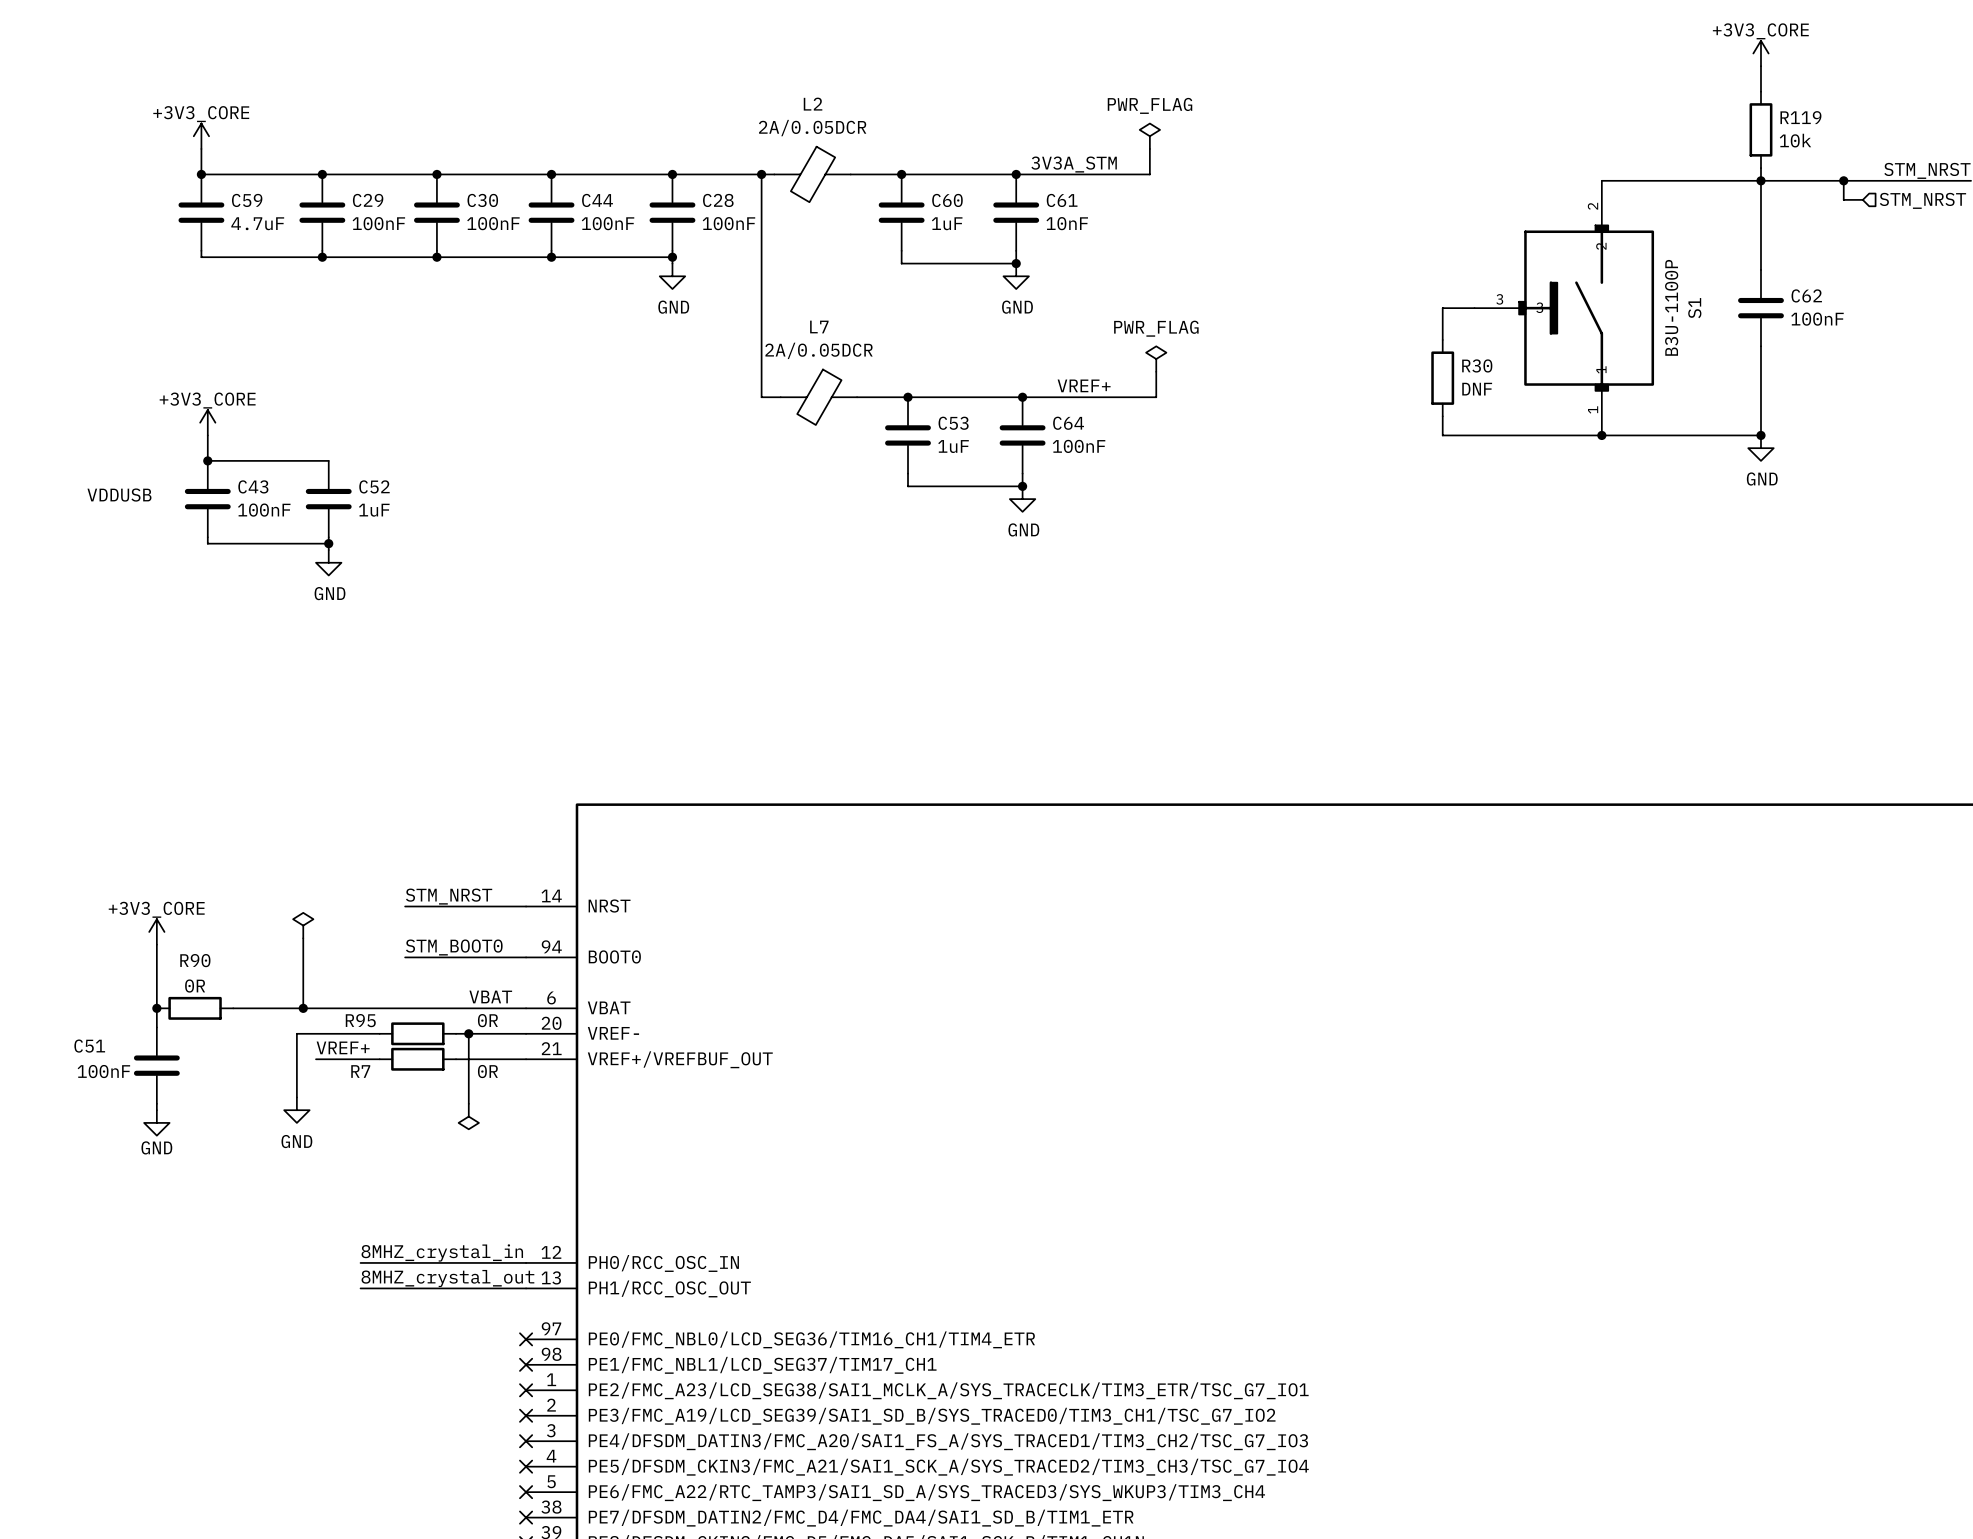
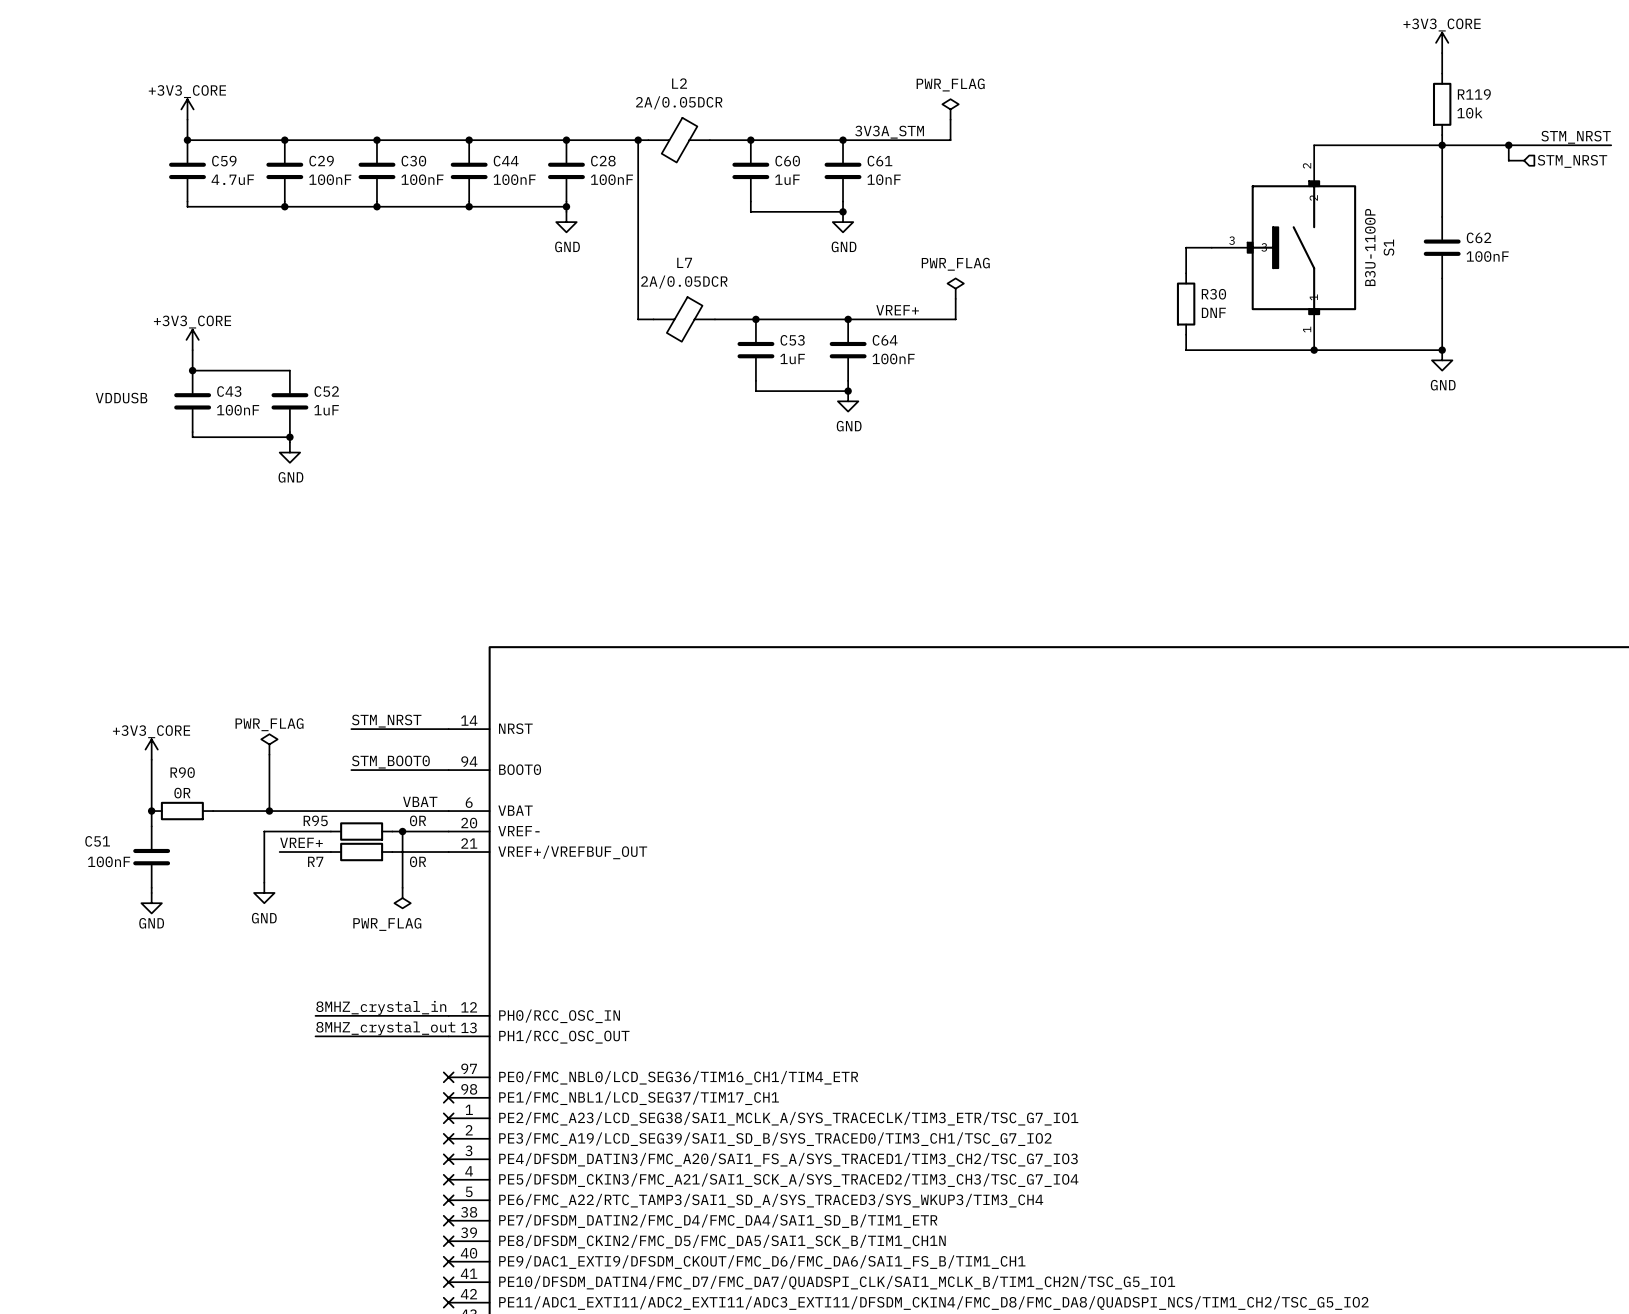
power symbol text: none -> PWR_FLAG (269, 724)
power symbol text: none -> PWR_FLAG (387, 924)

